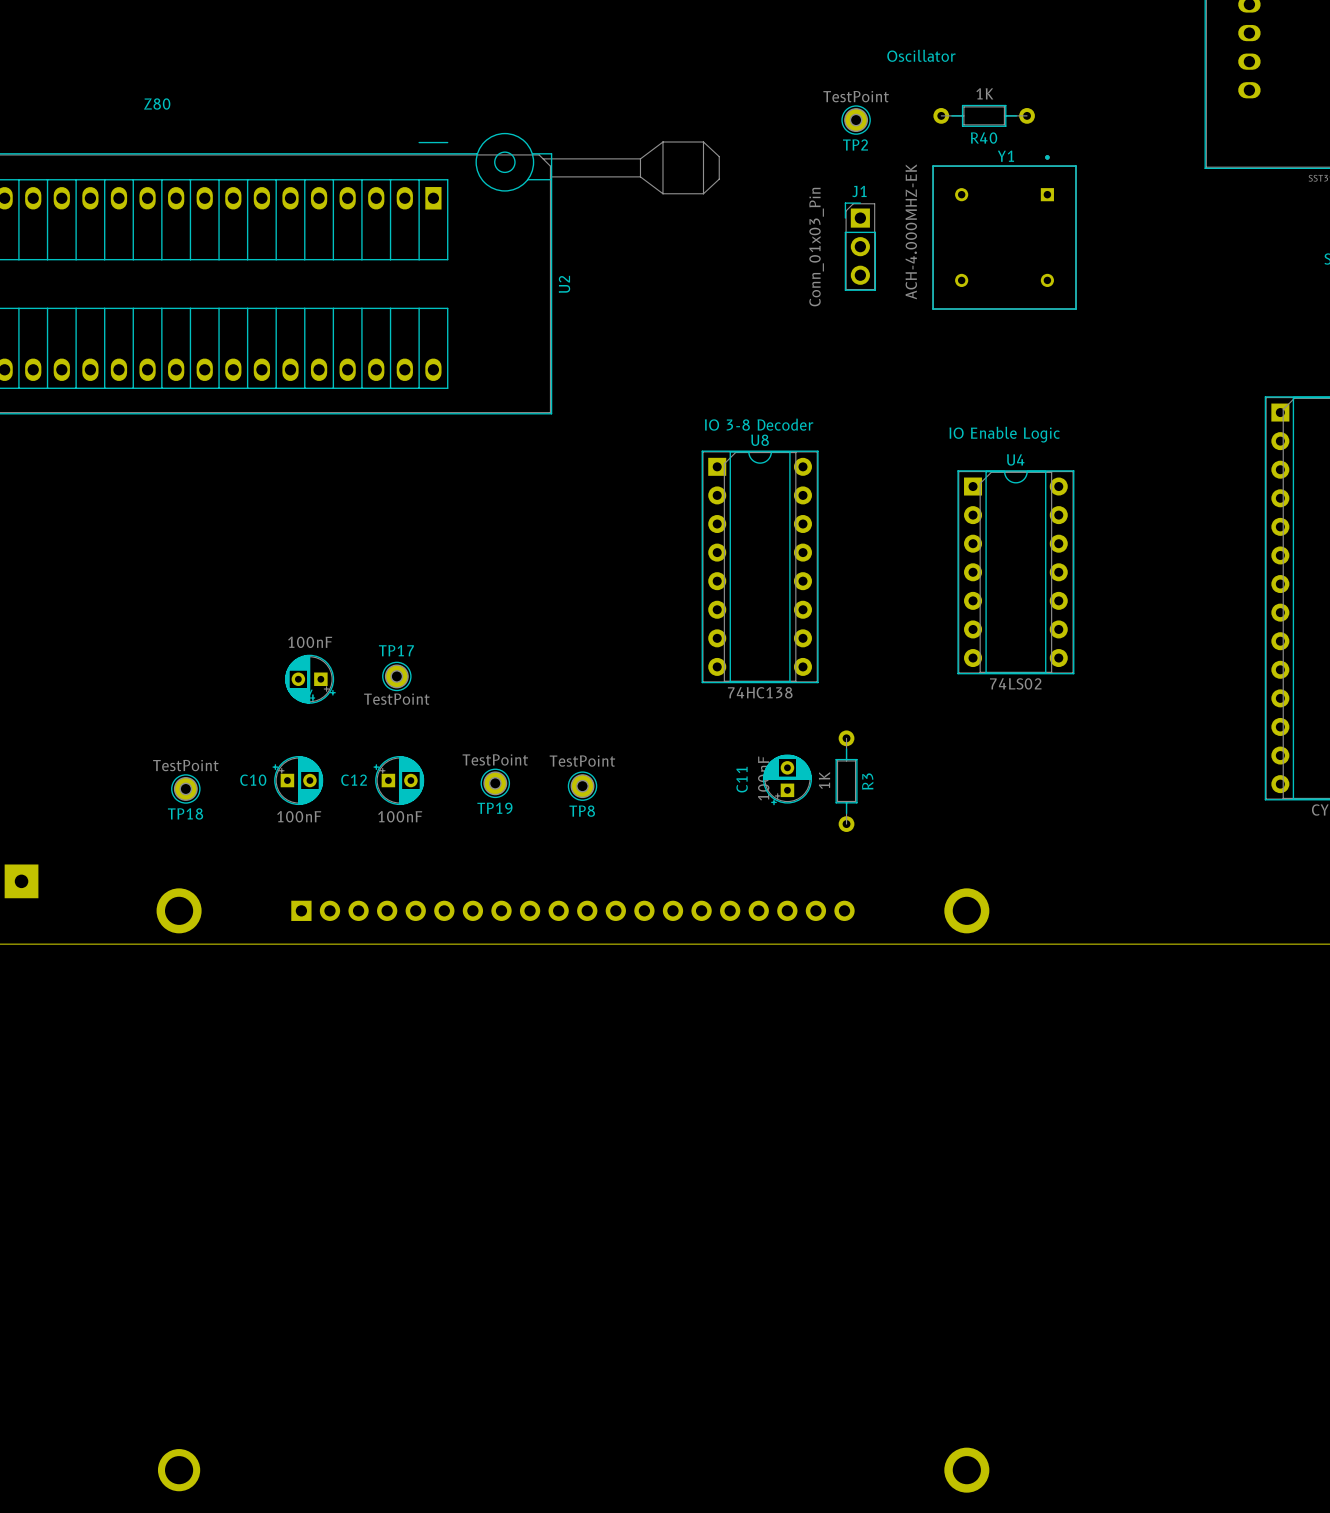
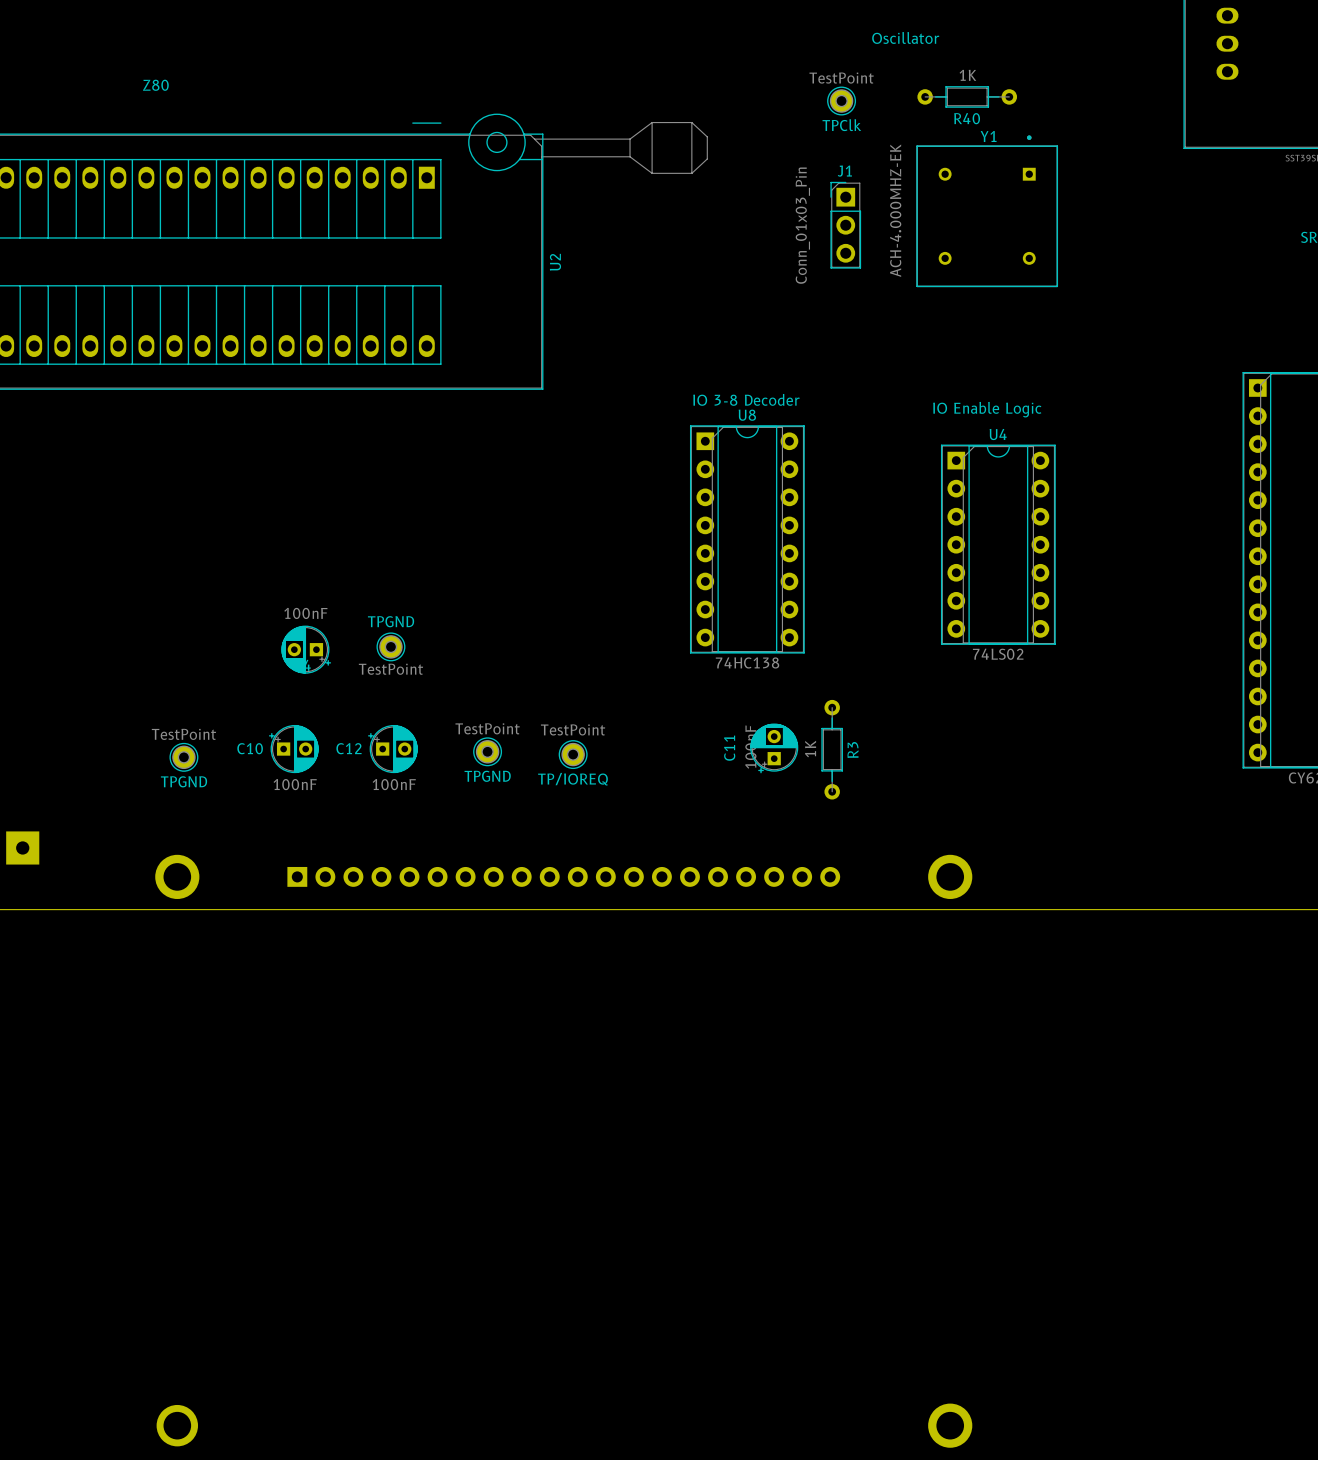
TP2 name: TP2 (855, 144) -> TPClk (841, 125)
TP17 name: TP17 (396, 650) -> TPGND (391, 621)
TP19 name: TP19 (494, 808) -> TPGND (487, 776)
TP8 name: TP8 (582, 811) -> TP/IOREQ (572, 779)
TP18 name: TP18 (185, 813) -> TPGND (184, 781)

